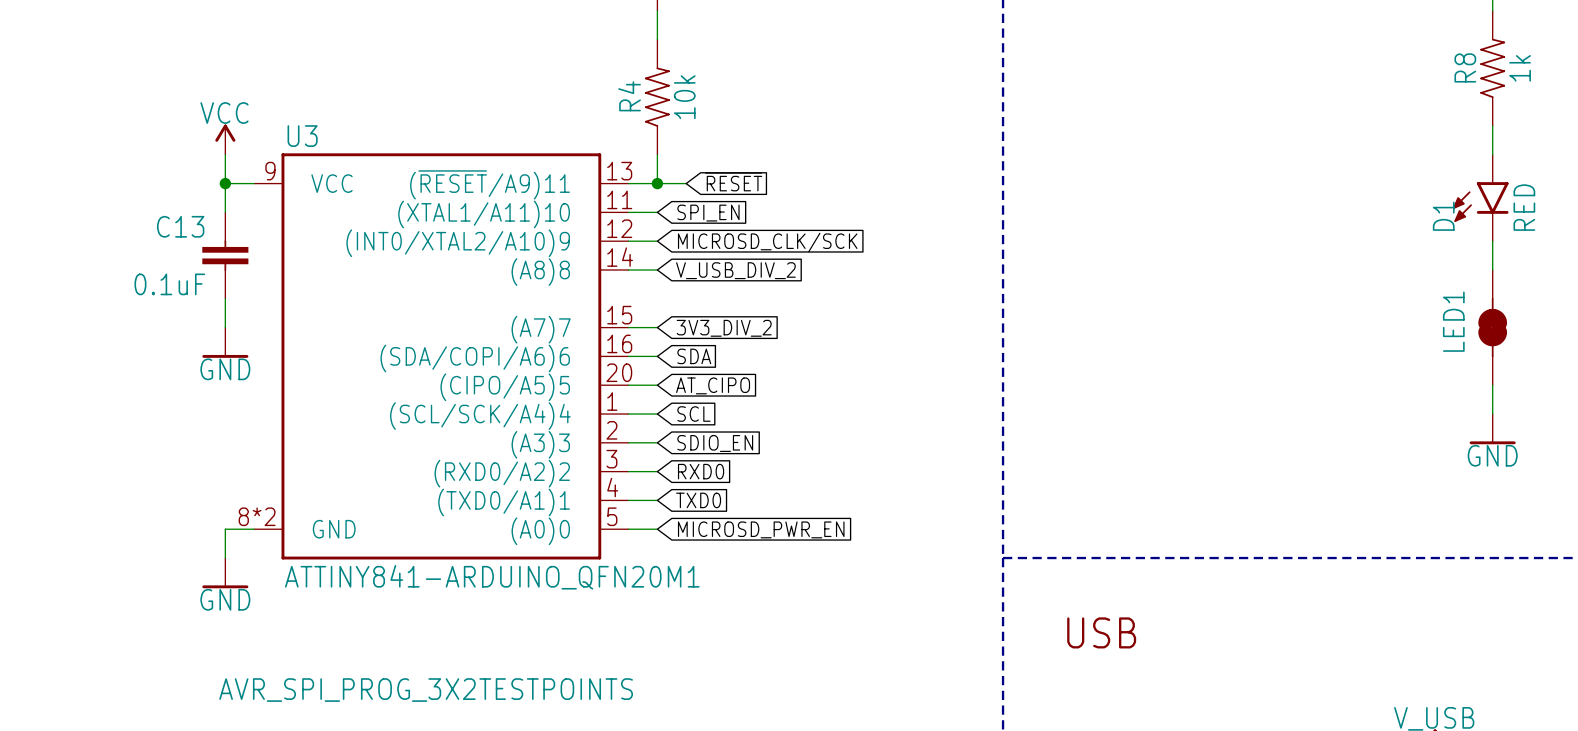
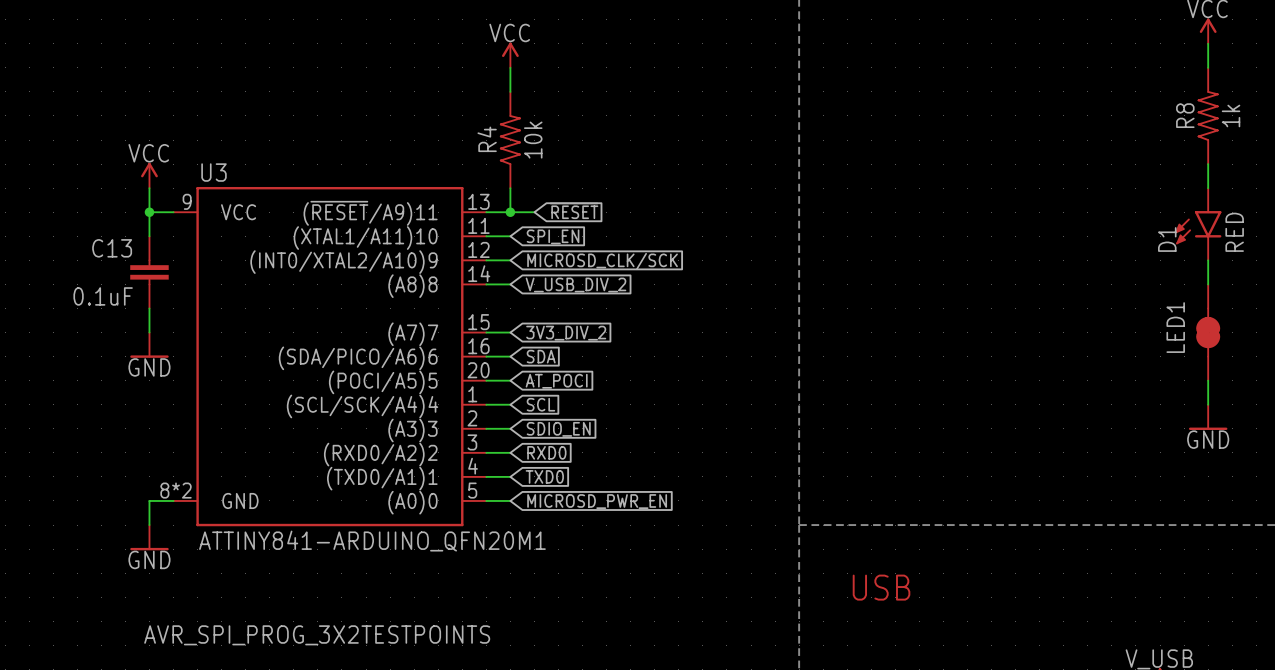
U3 pin name: (SDA/COPI/A6)6 (475, 358) -> (SDA/PICO/A6)6 (358, 358)
global label: AT_CIPO (713, 385) -> AT_POCI (556, 381)
U3 pin name: (CIPO/A5)5 (505, 387) -> (POCI/A5)5 (383, 382)

